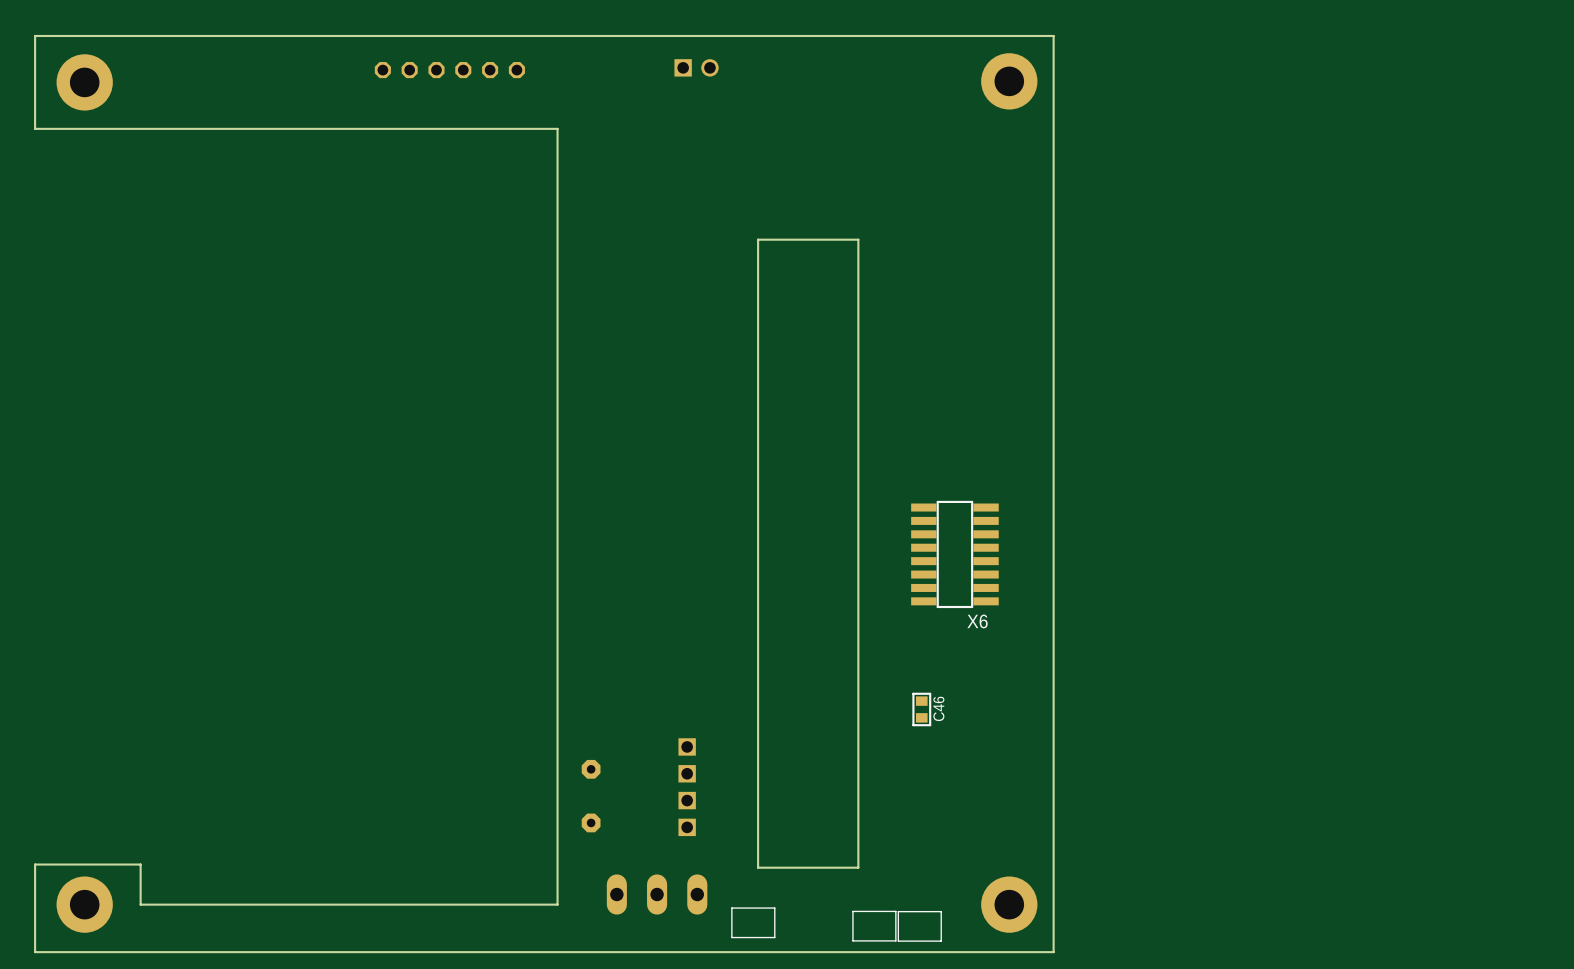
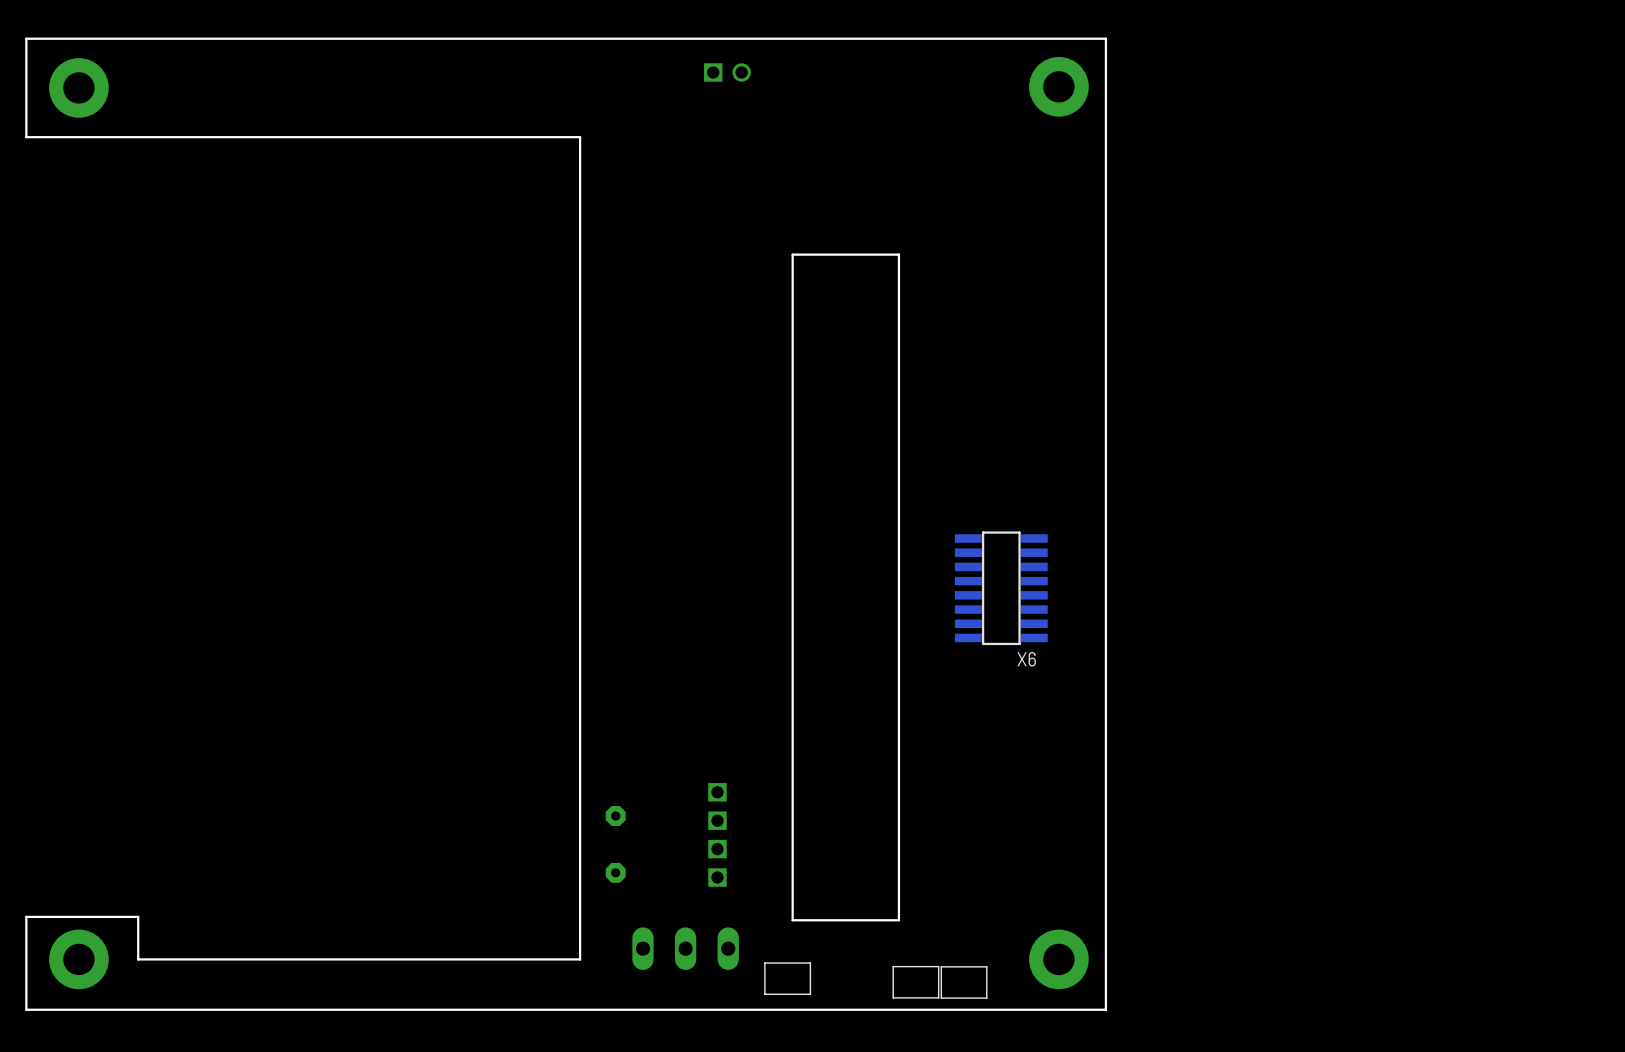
part: (449, 70) -> none
C46: (921, 709) -> none

